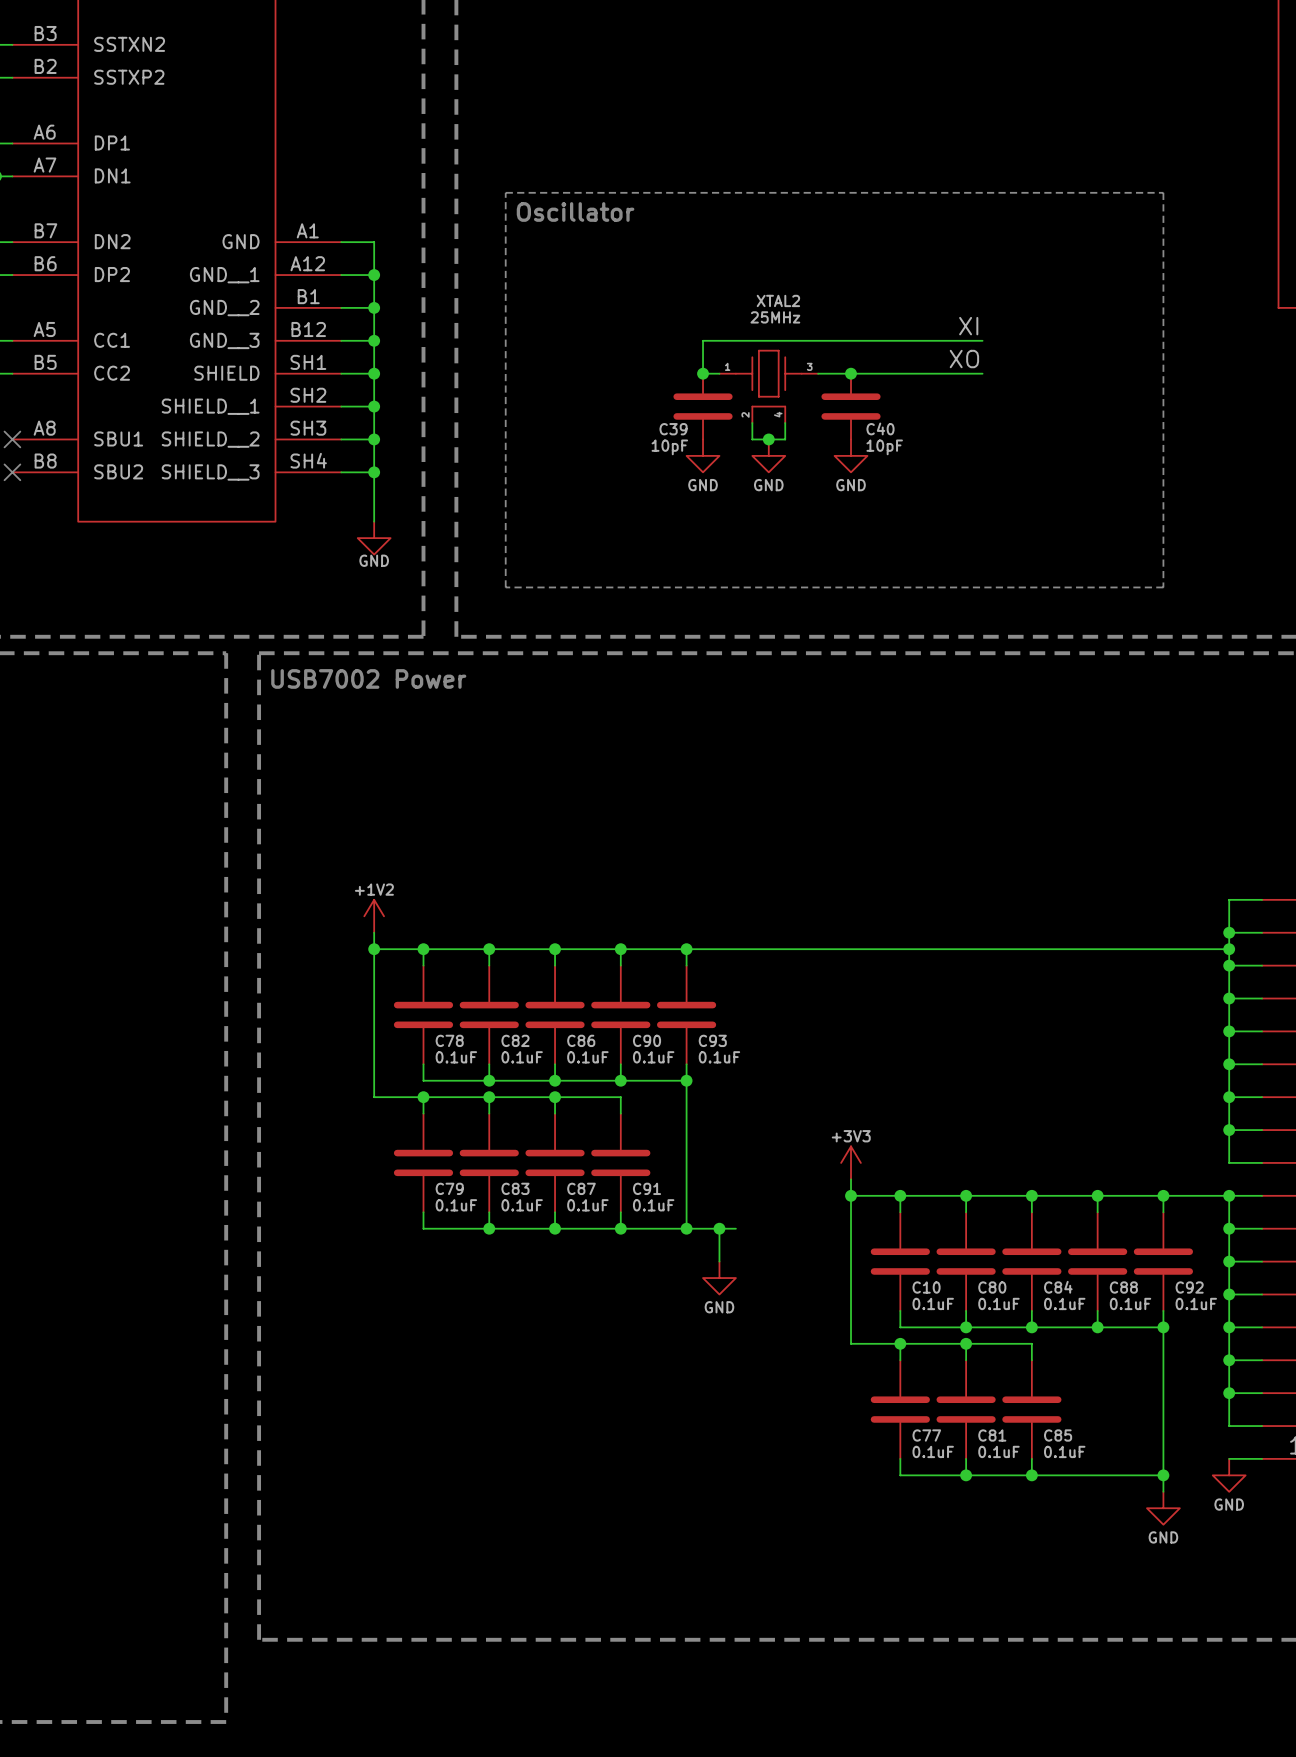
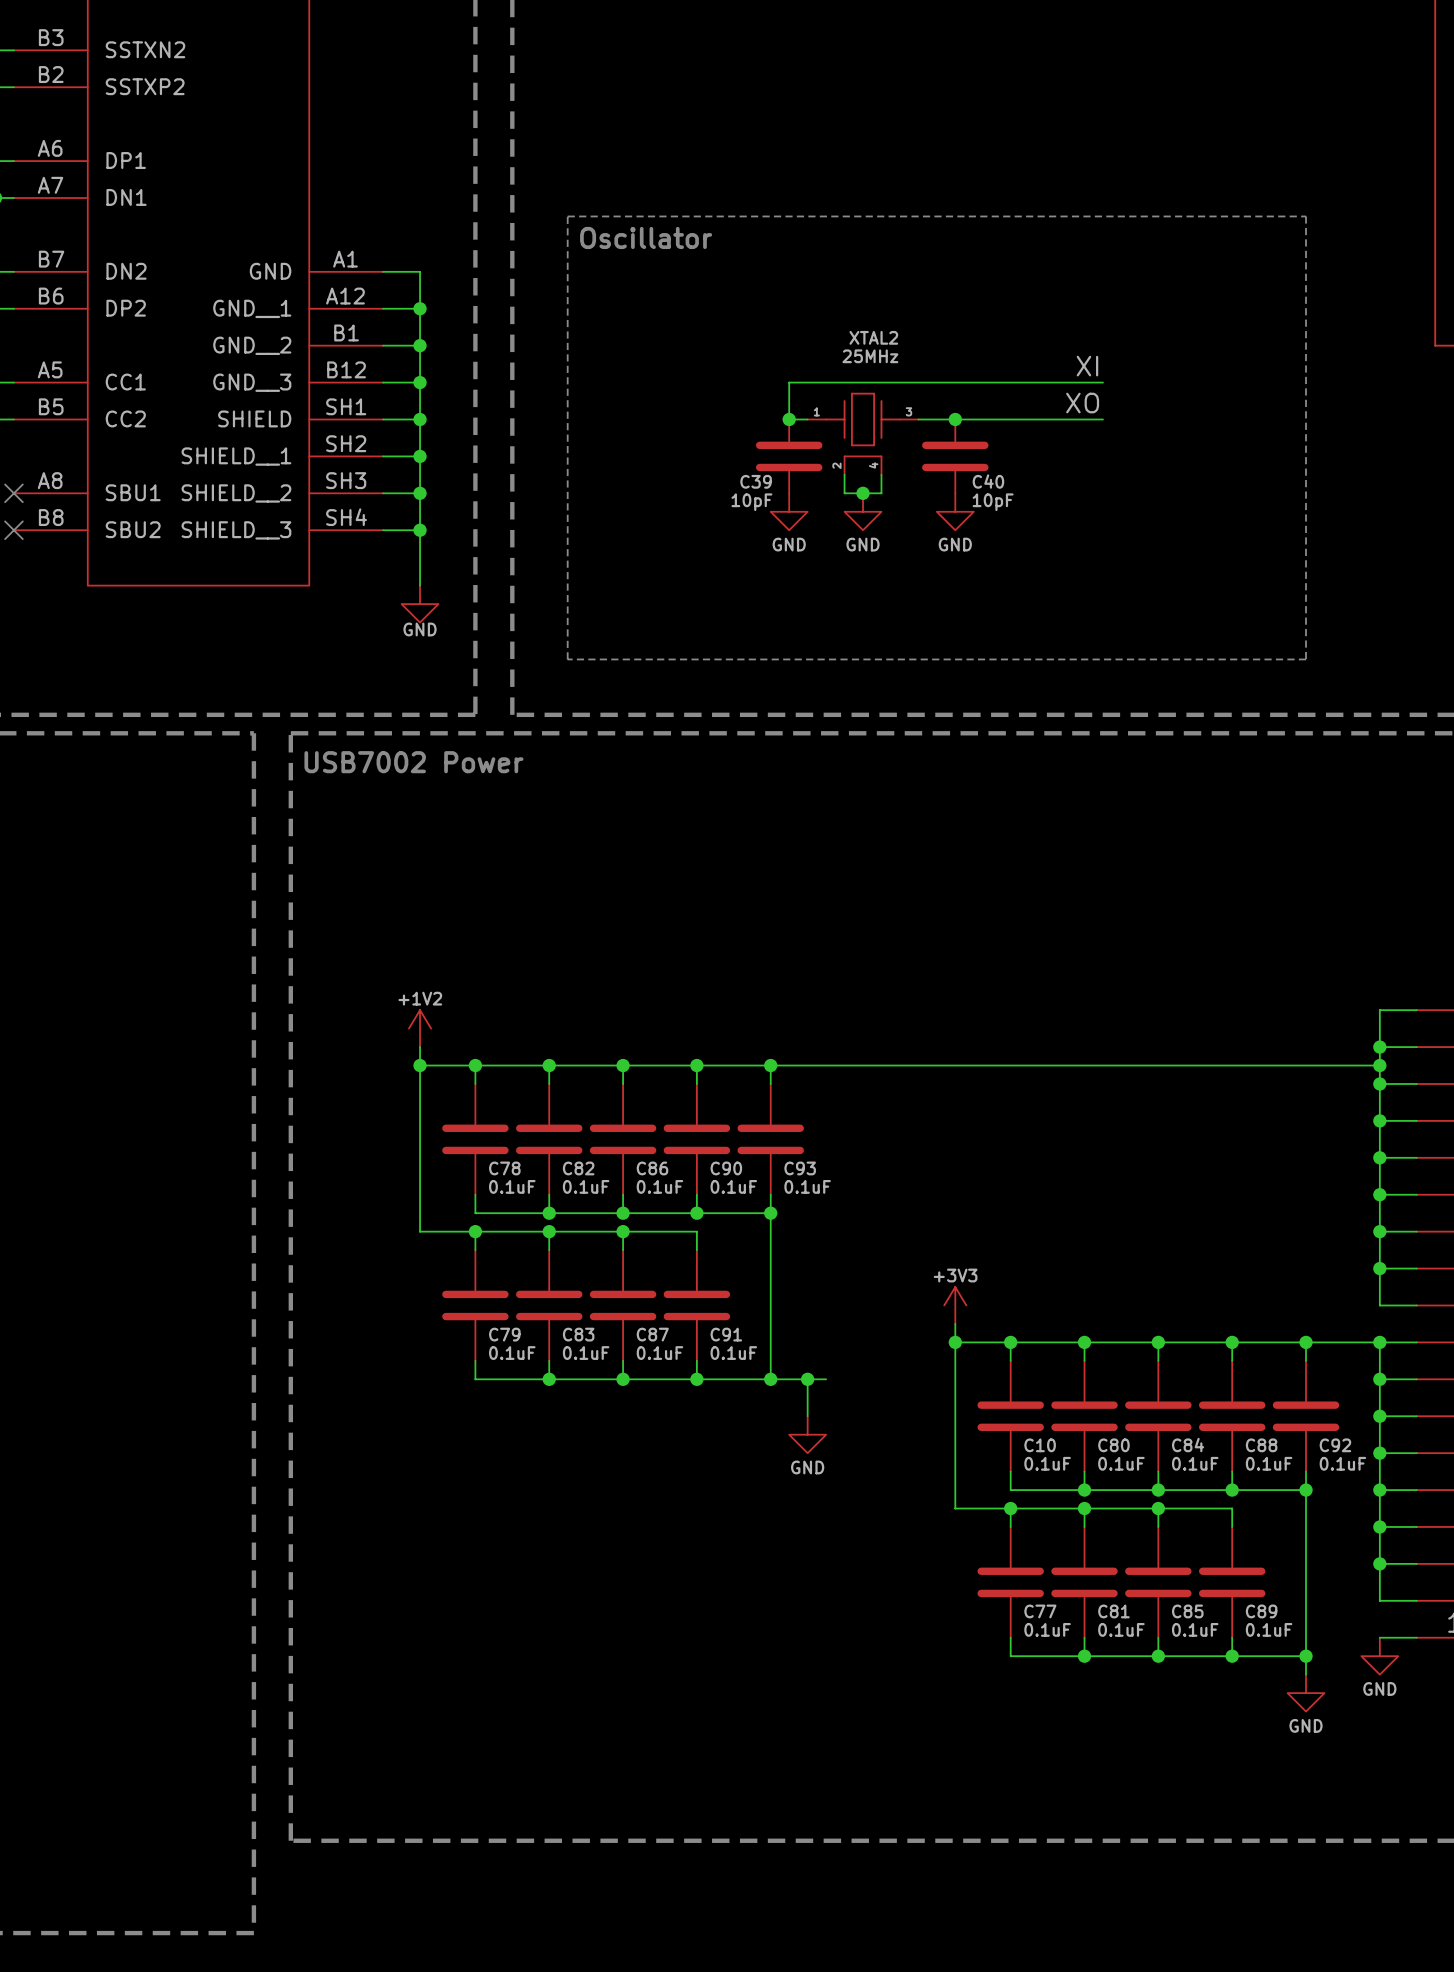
wire: none -> (1158, 1508) (1232, 1508) (1232, 1526)
junction: none -> (1158, 1508)
C89: none -> 0.1uF (1232, 1582)
wire: none -> (1232, 1637) (1232, 1656)
junction: none -> (1232, 1656)

